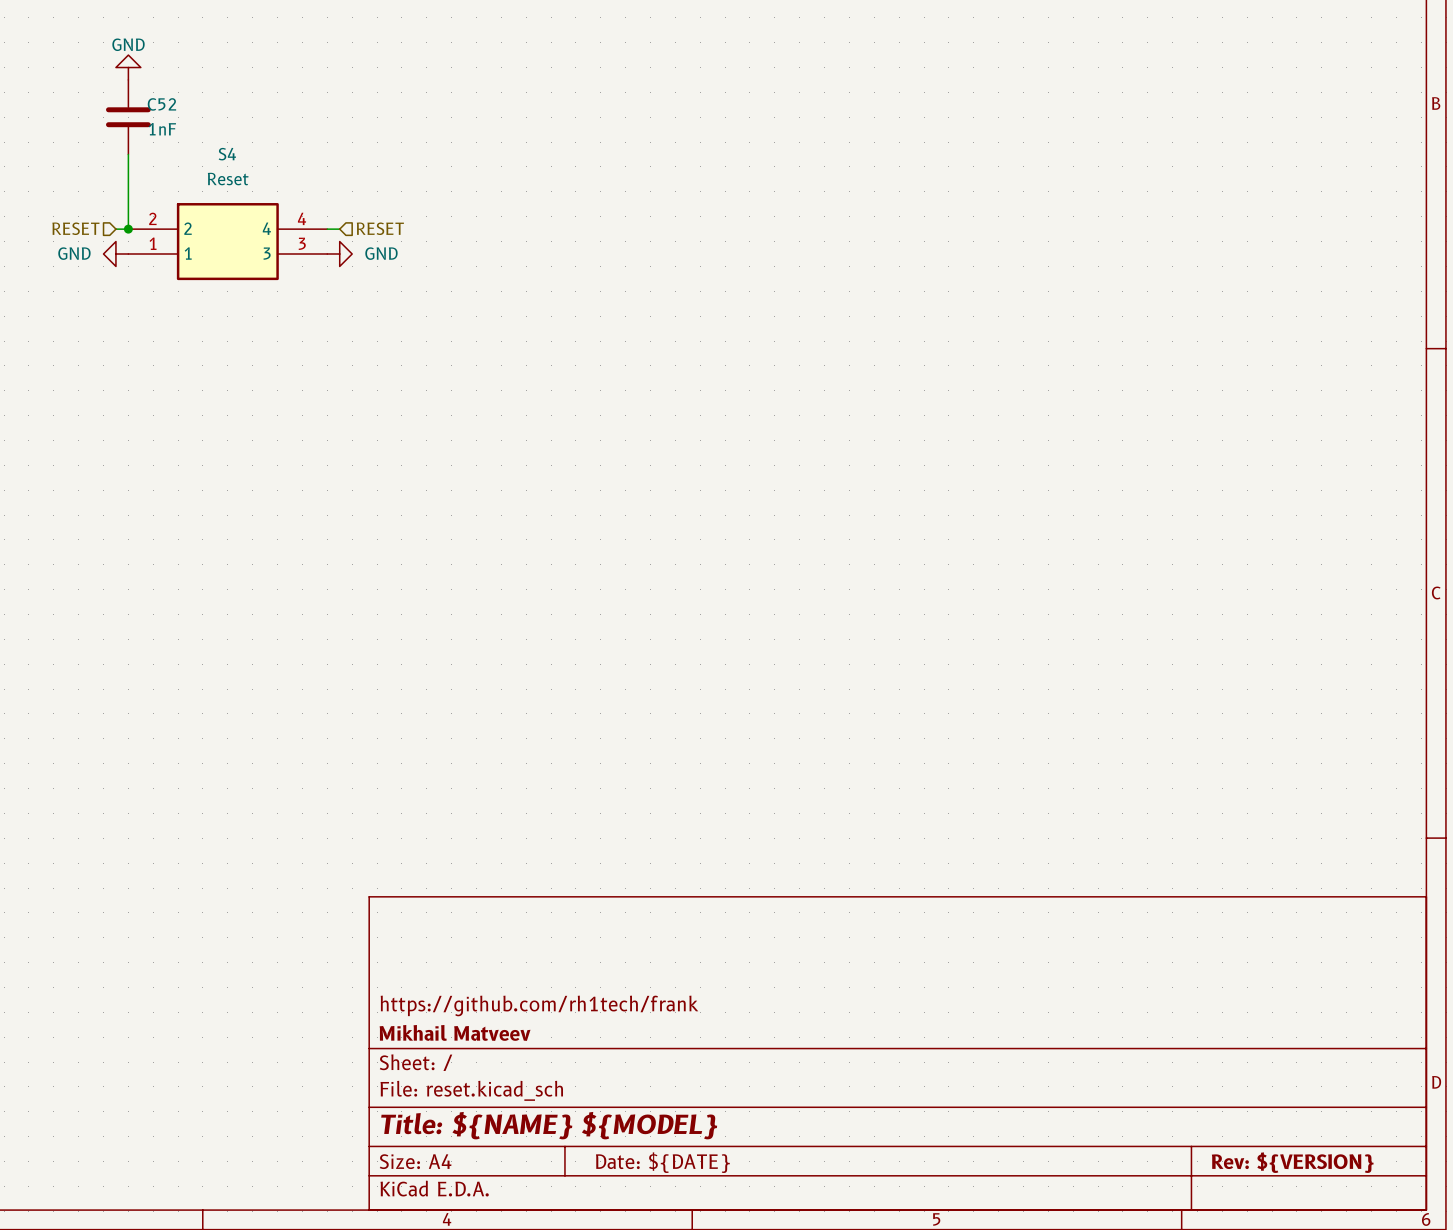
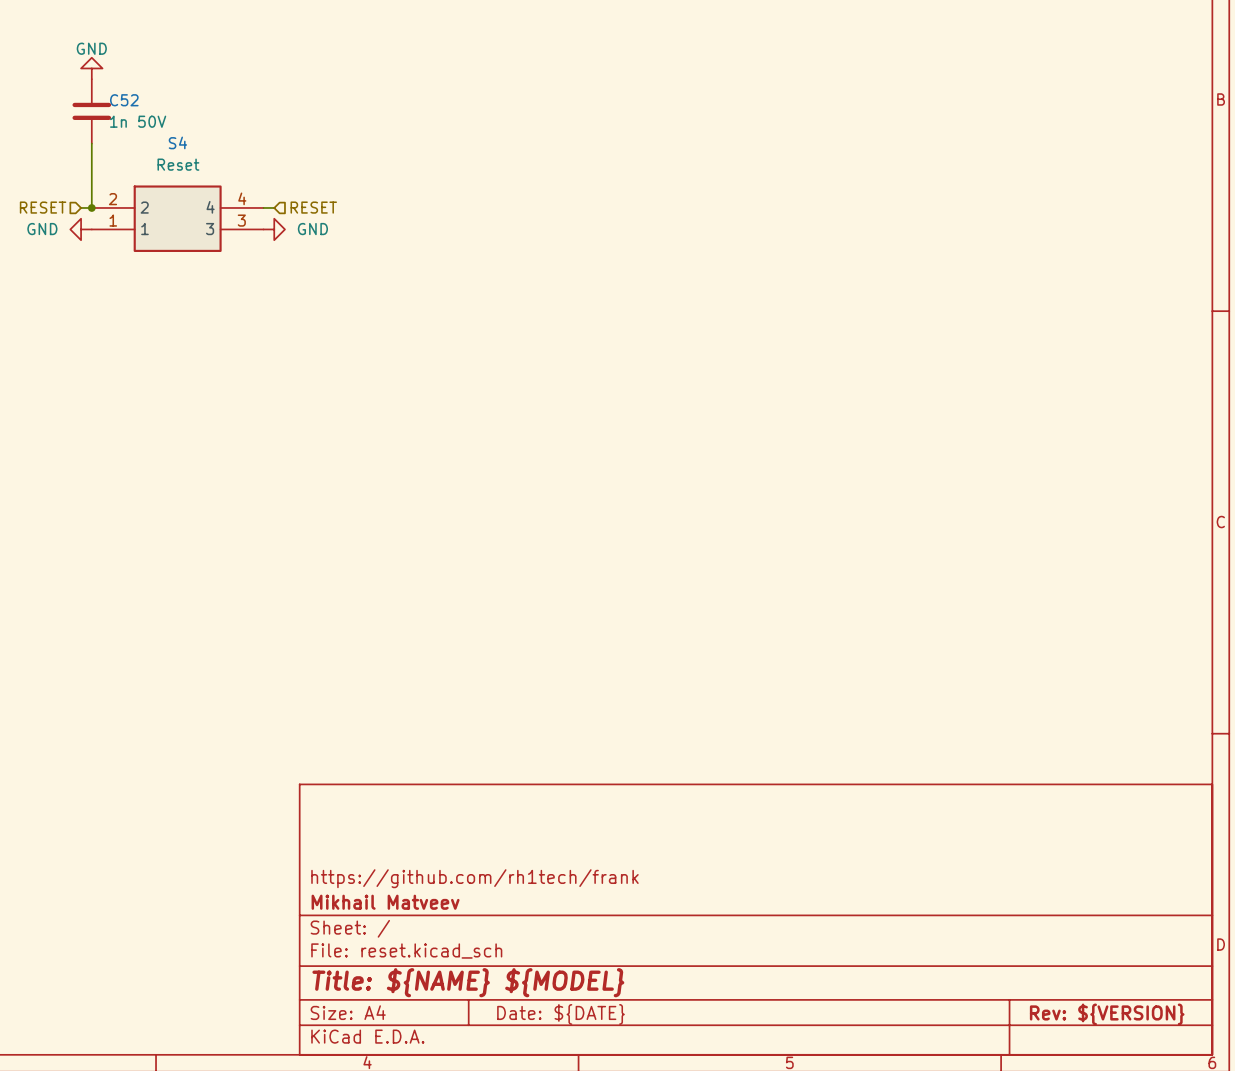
C52 value: 1nF (162, 129) -> 1n 50V (138, 121)

